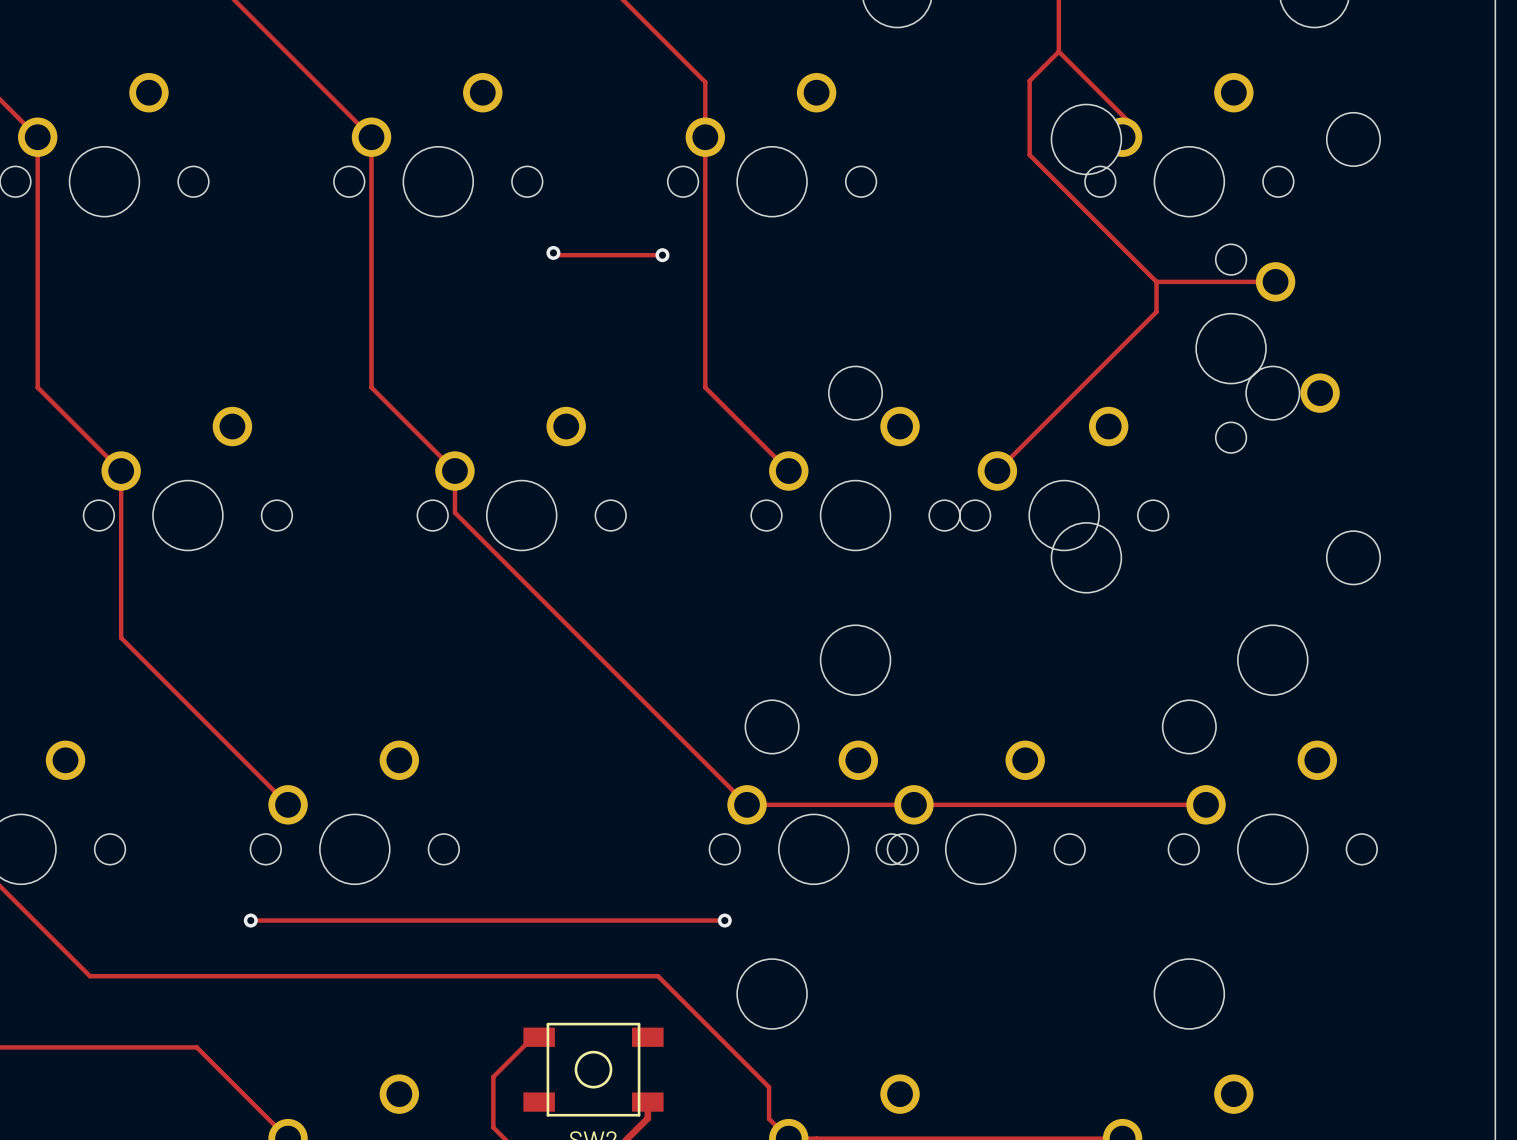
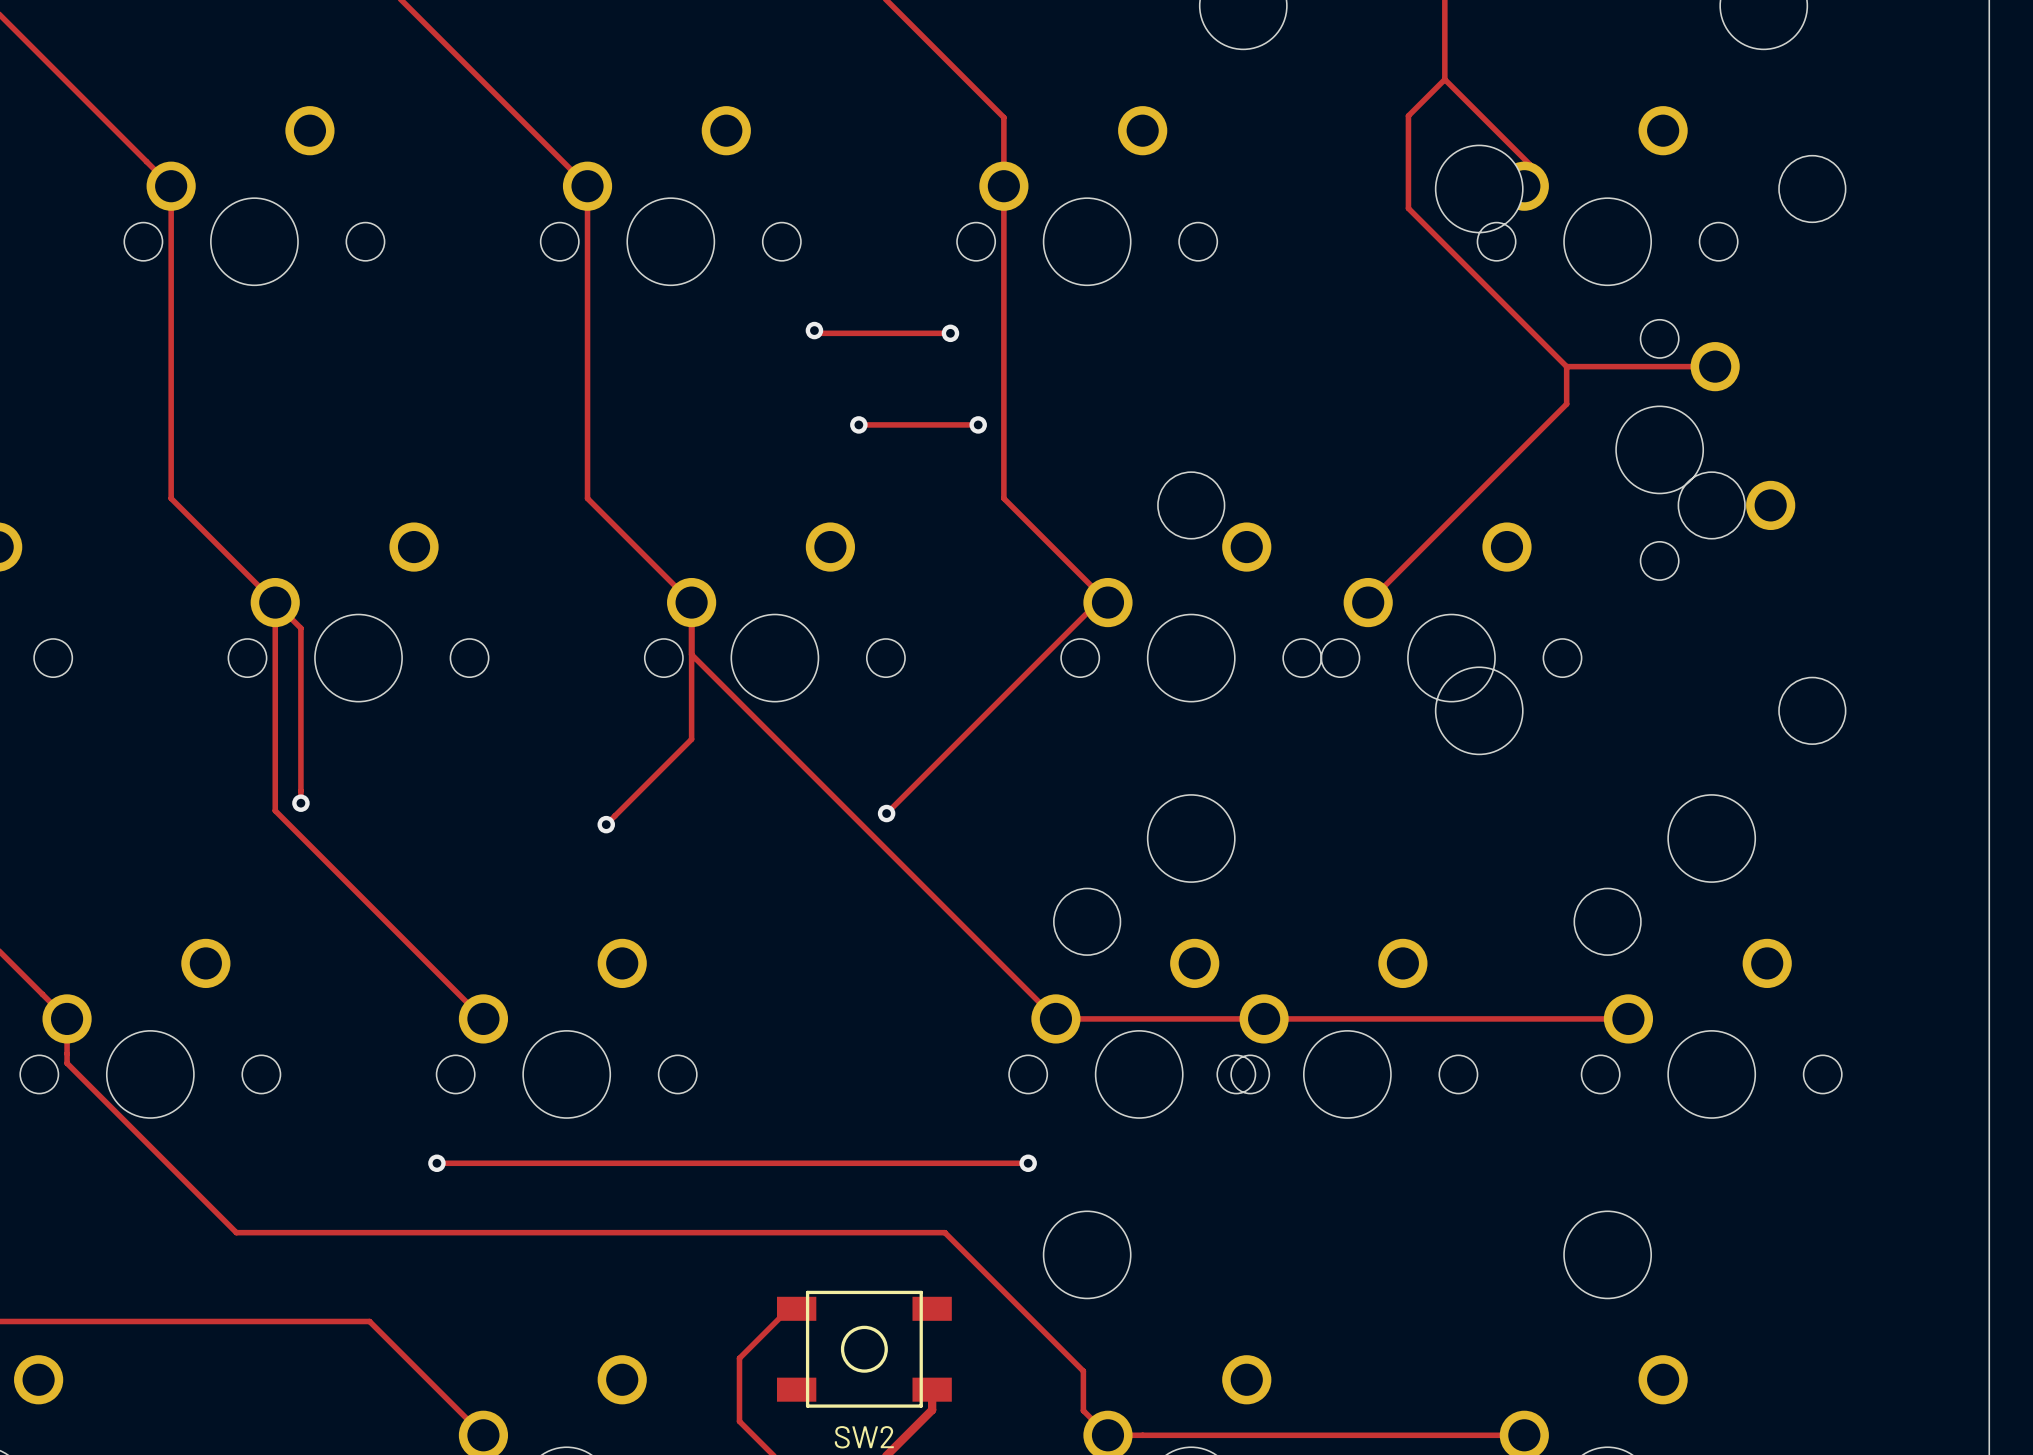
track: none -> (858, 424) (978, 424)
via: none -> (858, 424)
via: none -> (978, 424)
track: none -> (275, 602) (300, 628) (300, 803)
track: none -> (1107, 602) (1097, 602) (886, 813)
track: none -> (691, 654) (691, 739) (606, 824)
via: none -> (300, 803)
via: none -> (886, 813)
via: none -> (606, 824)

